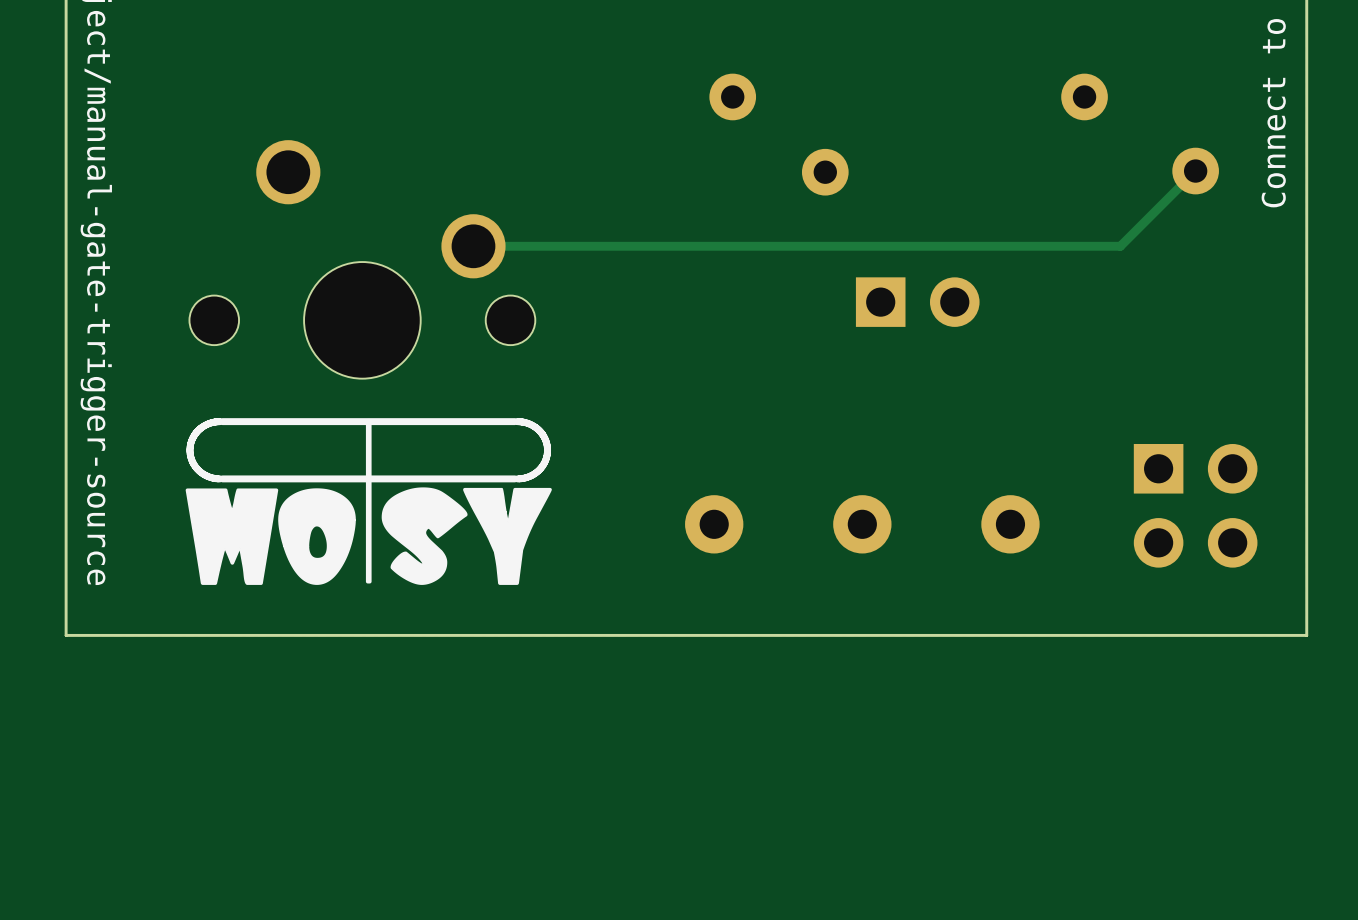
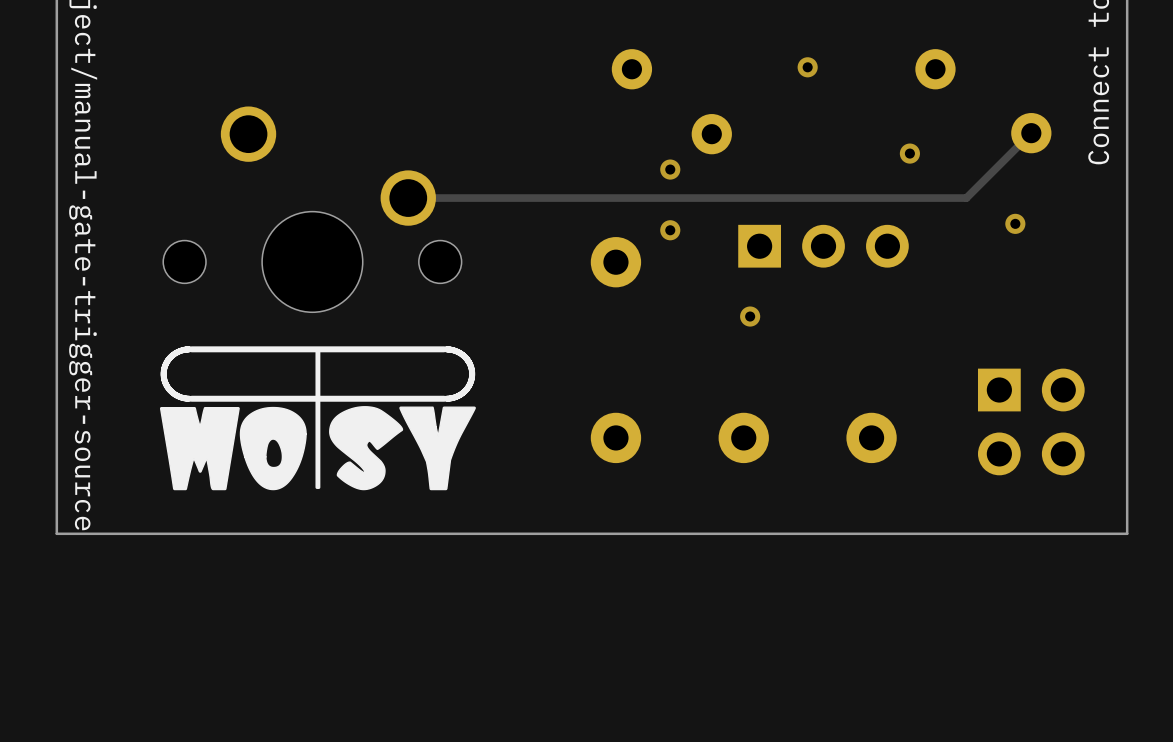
via: none -> (807, 67)
via: none -> (909, 153)
via: none -> (670, 169)
via: none -> (1015, 223)
via: none -> (670, 230)
part: none -> (823, 246)
part: none -> (615, 262)
via: none -> (750, 316)

